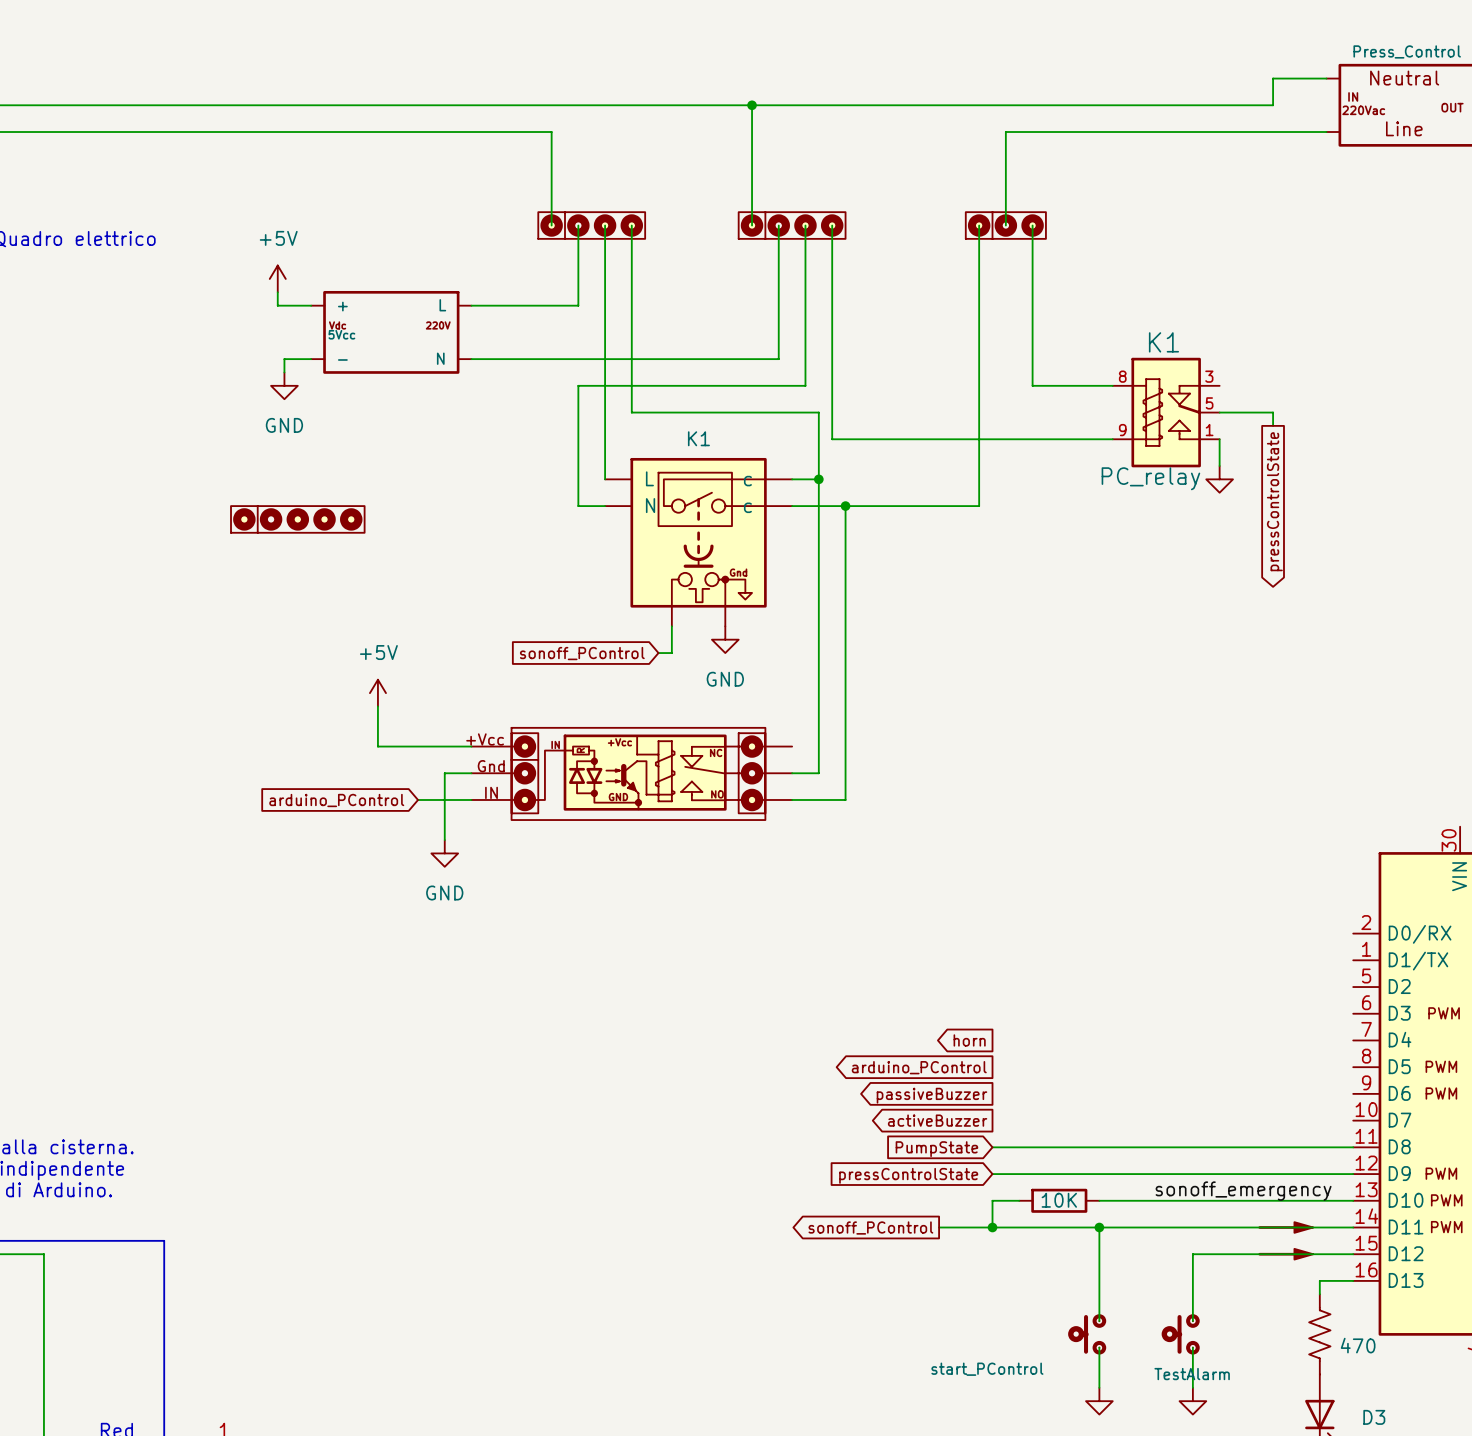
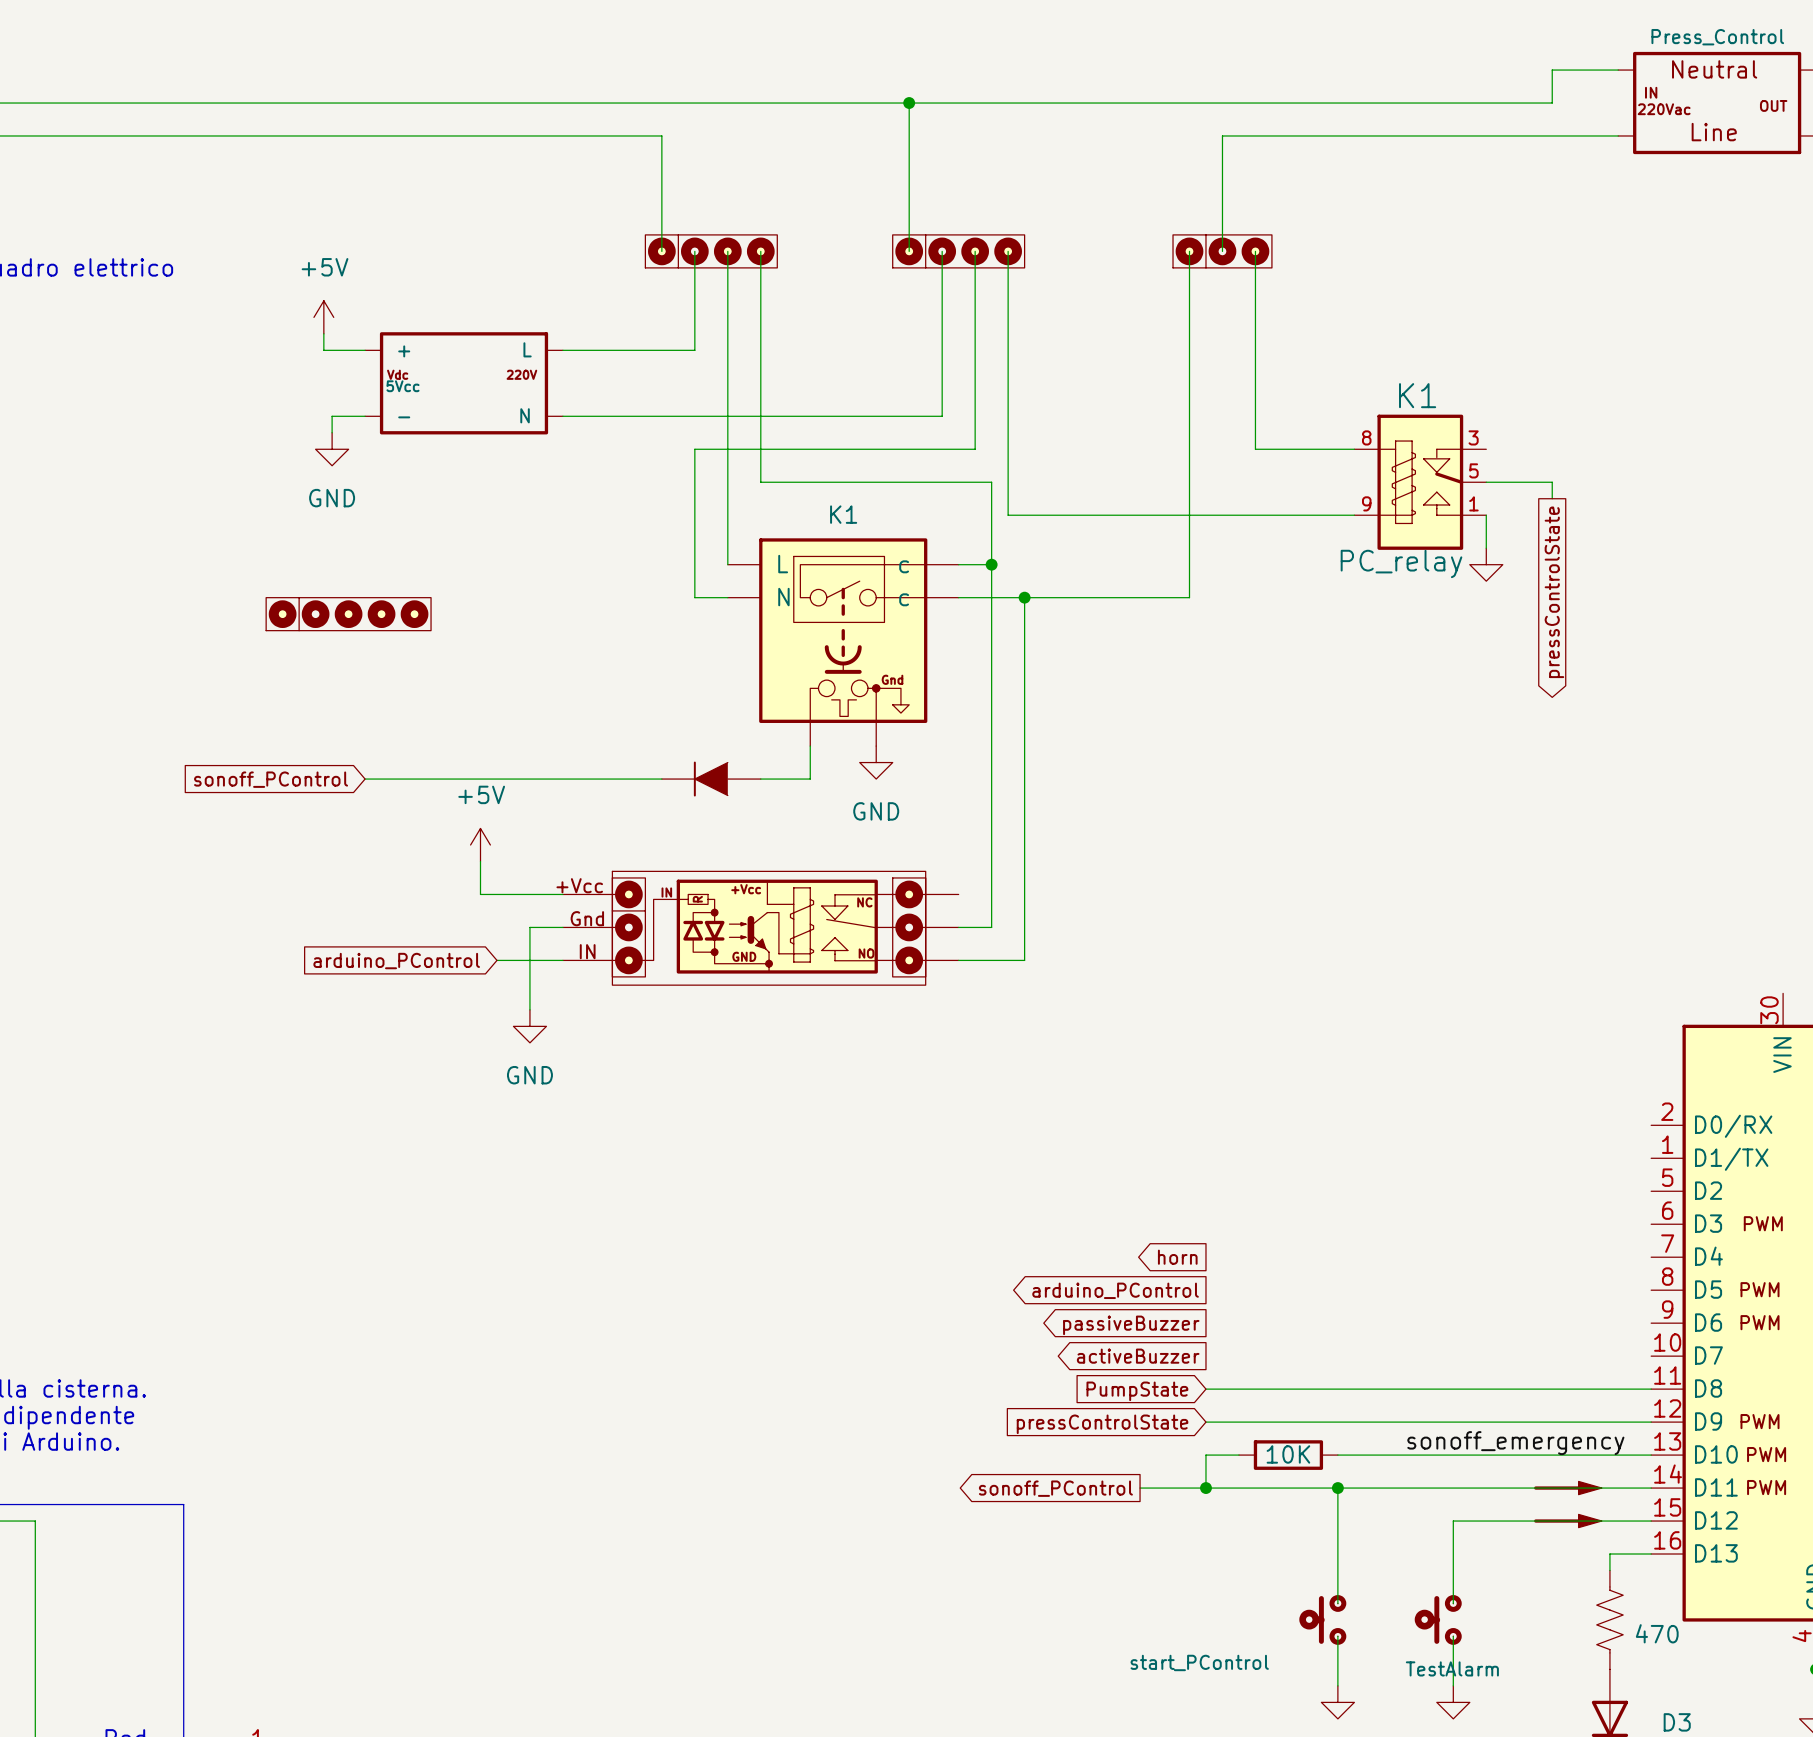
global label: none -> sonoff_PControl (271, 779)
wire: none -> (365, 779) (661, 779)
global label: sonoff_PControl (582, 653) -> none
part: none -> (711, 779)
wire: none -> (760, 779) (793, 779)
power symbol position: +5V (377, 693) -> +5V (480, 844)
wire: (377, 706) (377, 746) (404, 746) -> (480, 861) (480, 894)

